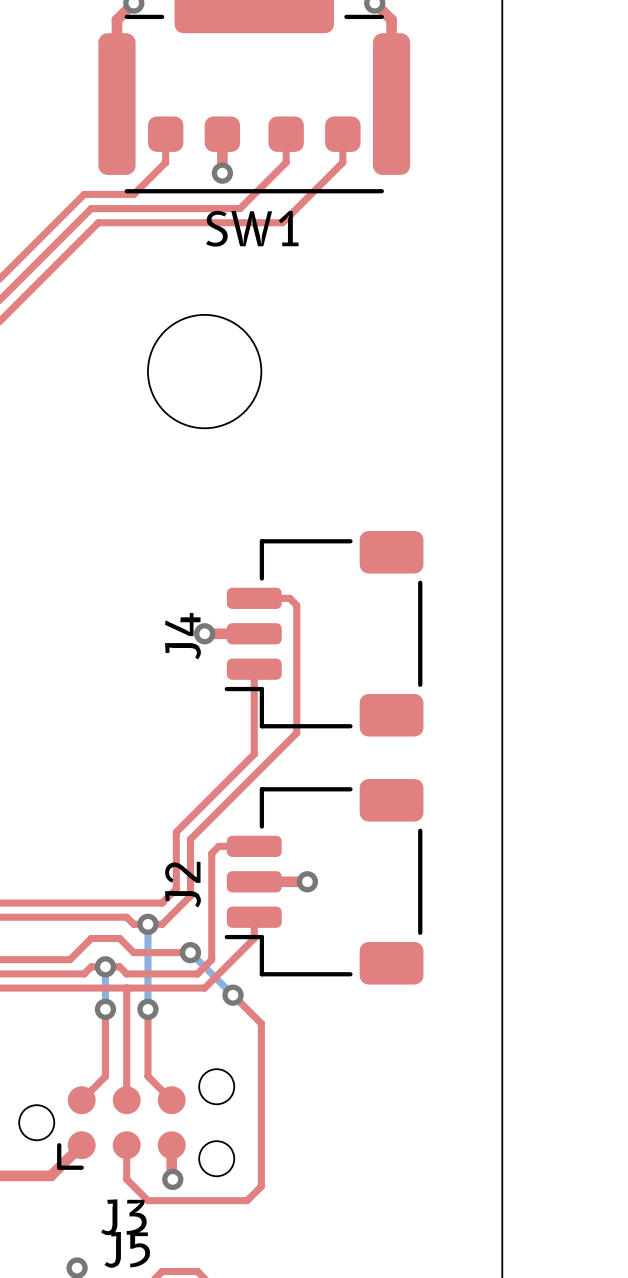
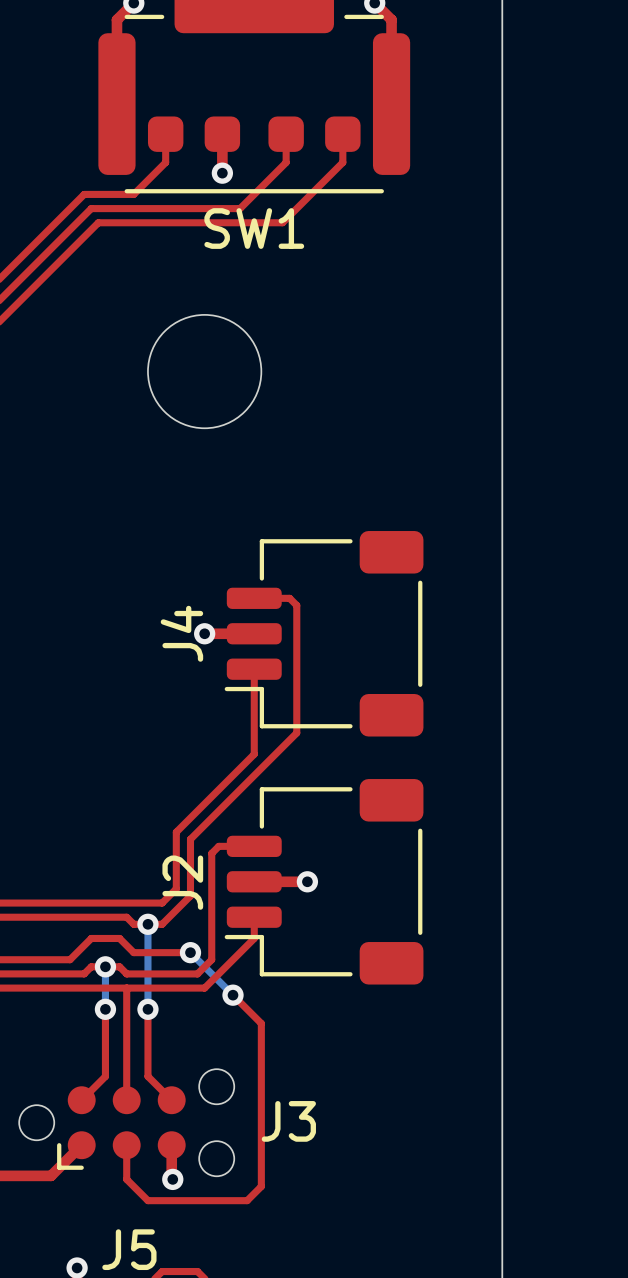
J3 name position: J3 (123, 1217) -> J3 (288, 1121)

